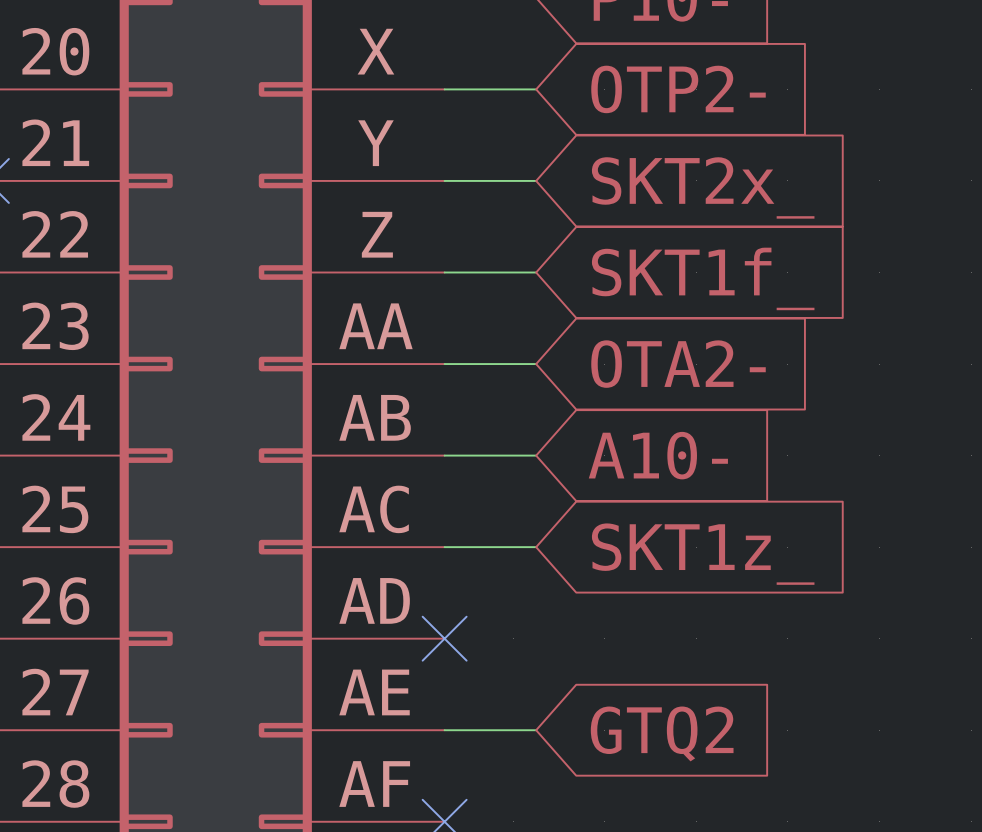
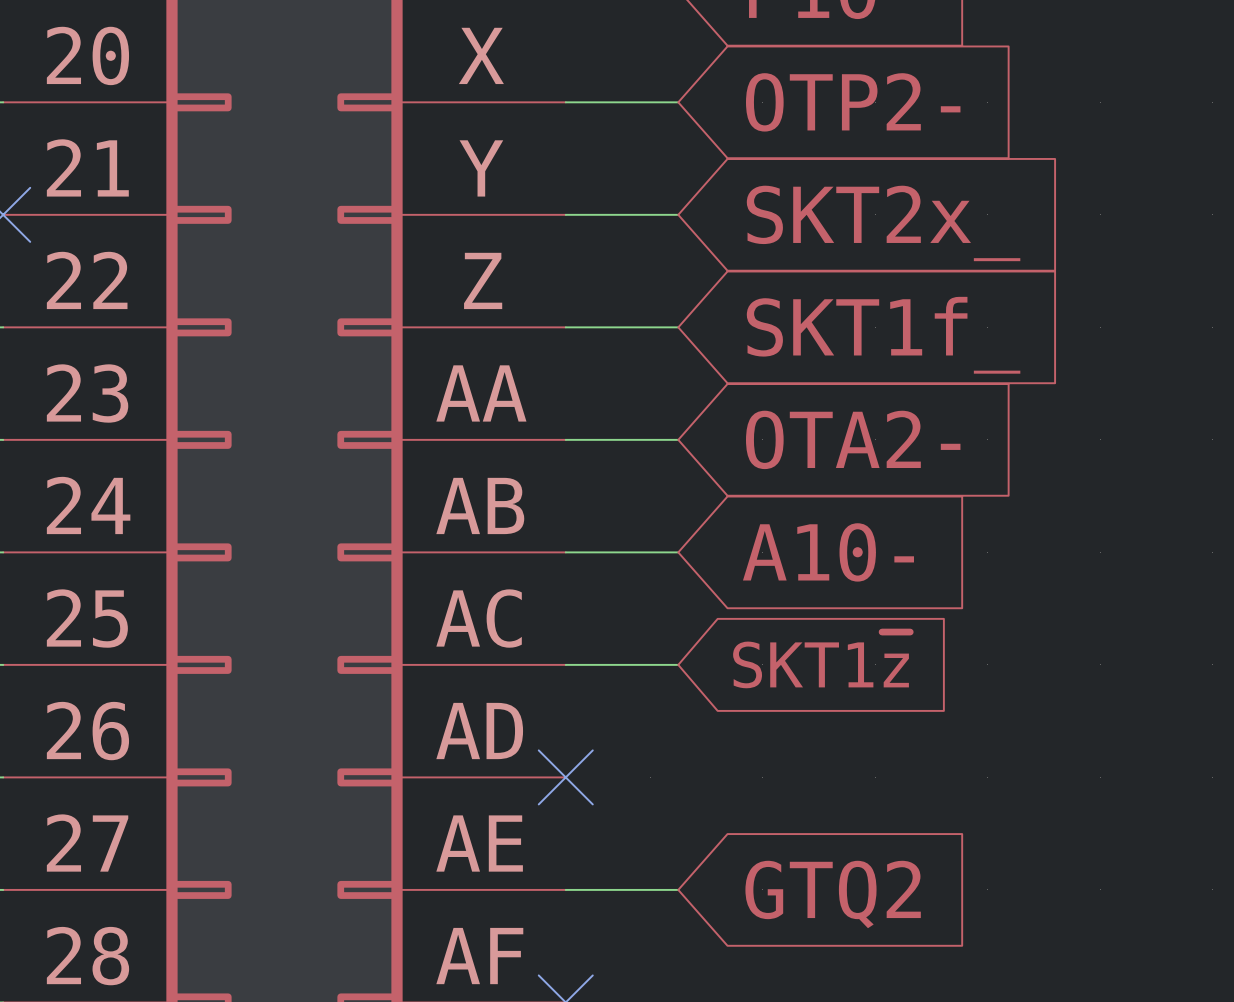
global label: SKT1z_ (703, 554) -> SKT1~{z} (821, 660)

